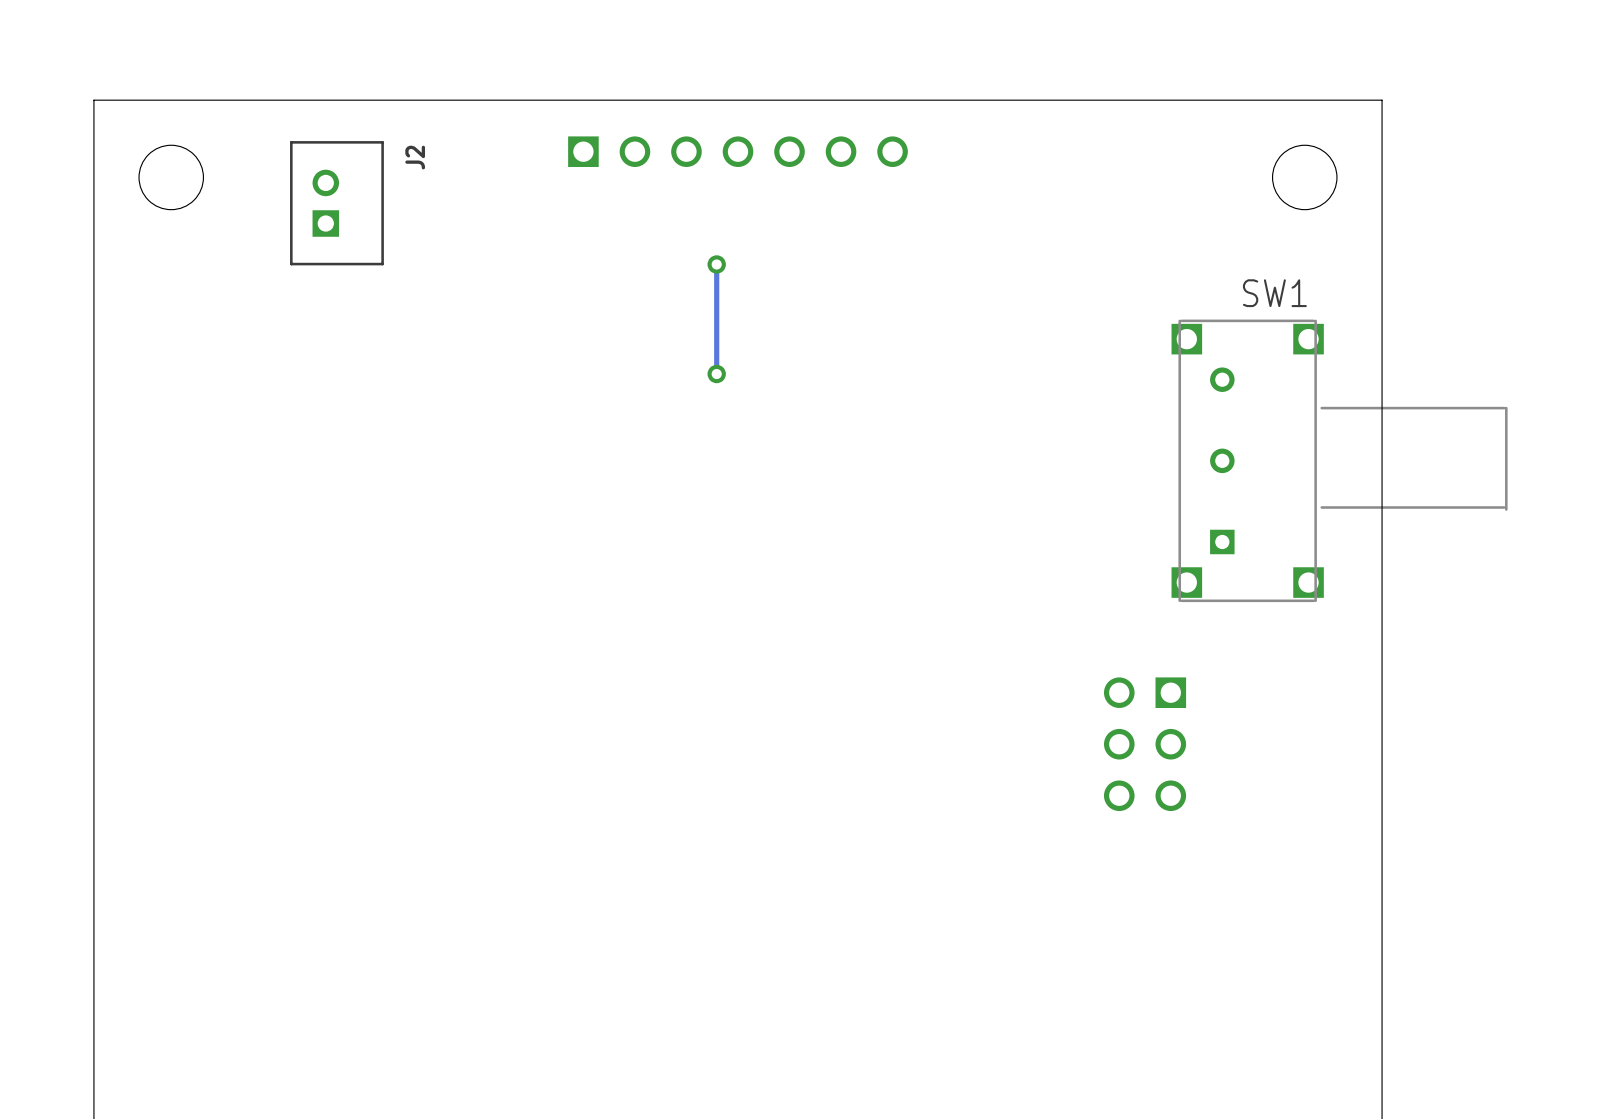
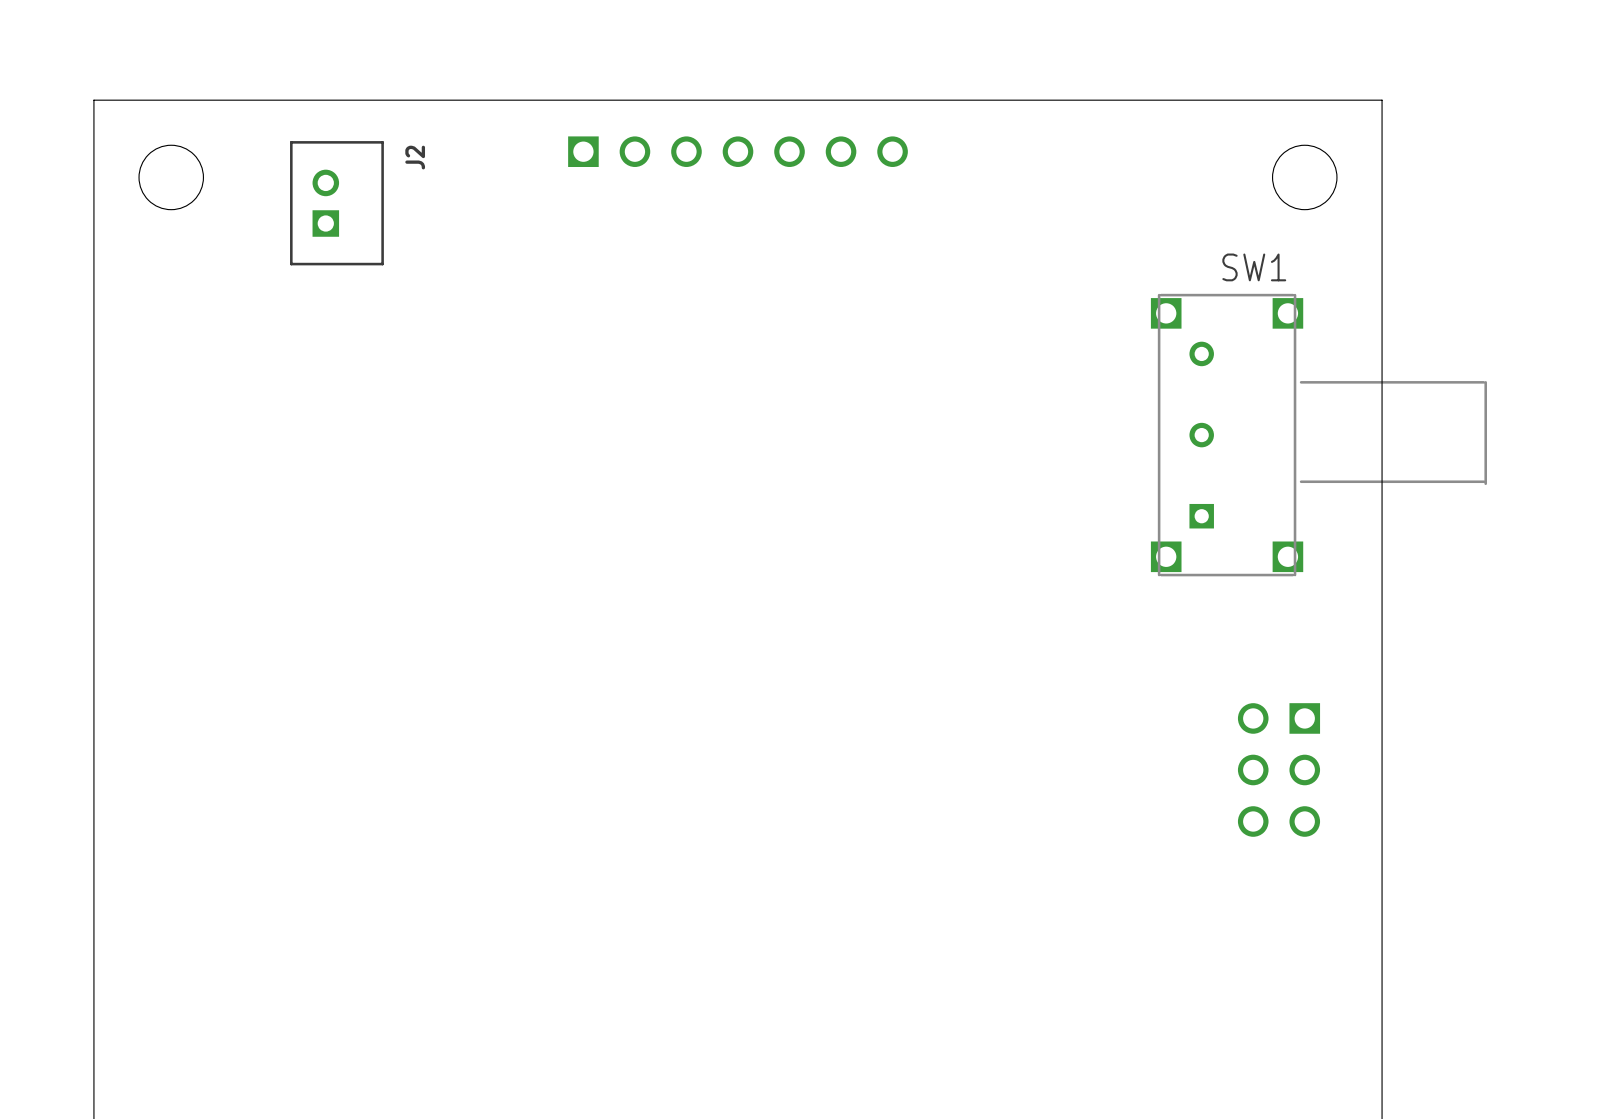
track: (716, 264) (716, 374) -> none
via: (716, 264) -> none
via: (716, 374) -> none
SW1 position: (1339, 460) -> (1318, 435)
part position: (1145, 744) -> (1278, 769)

